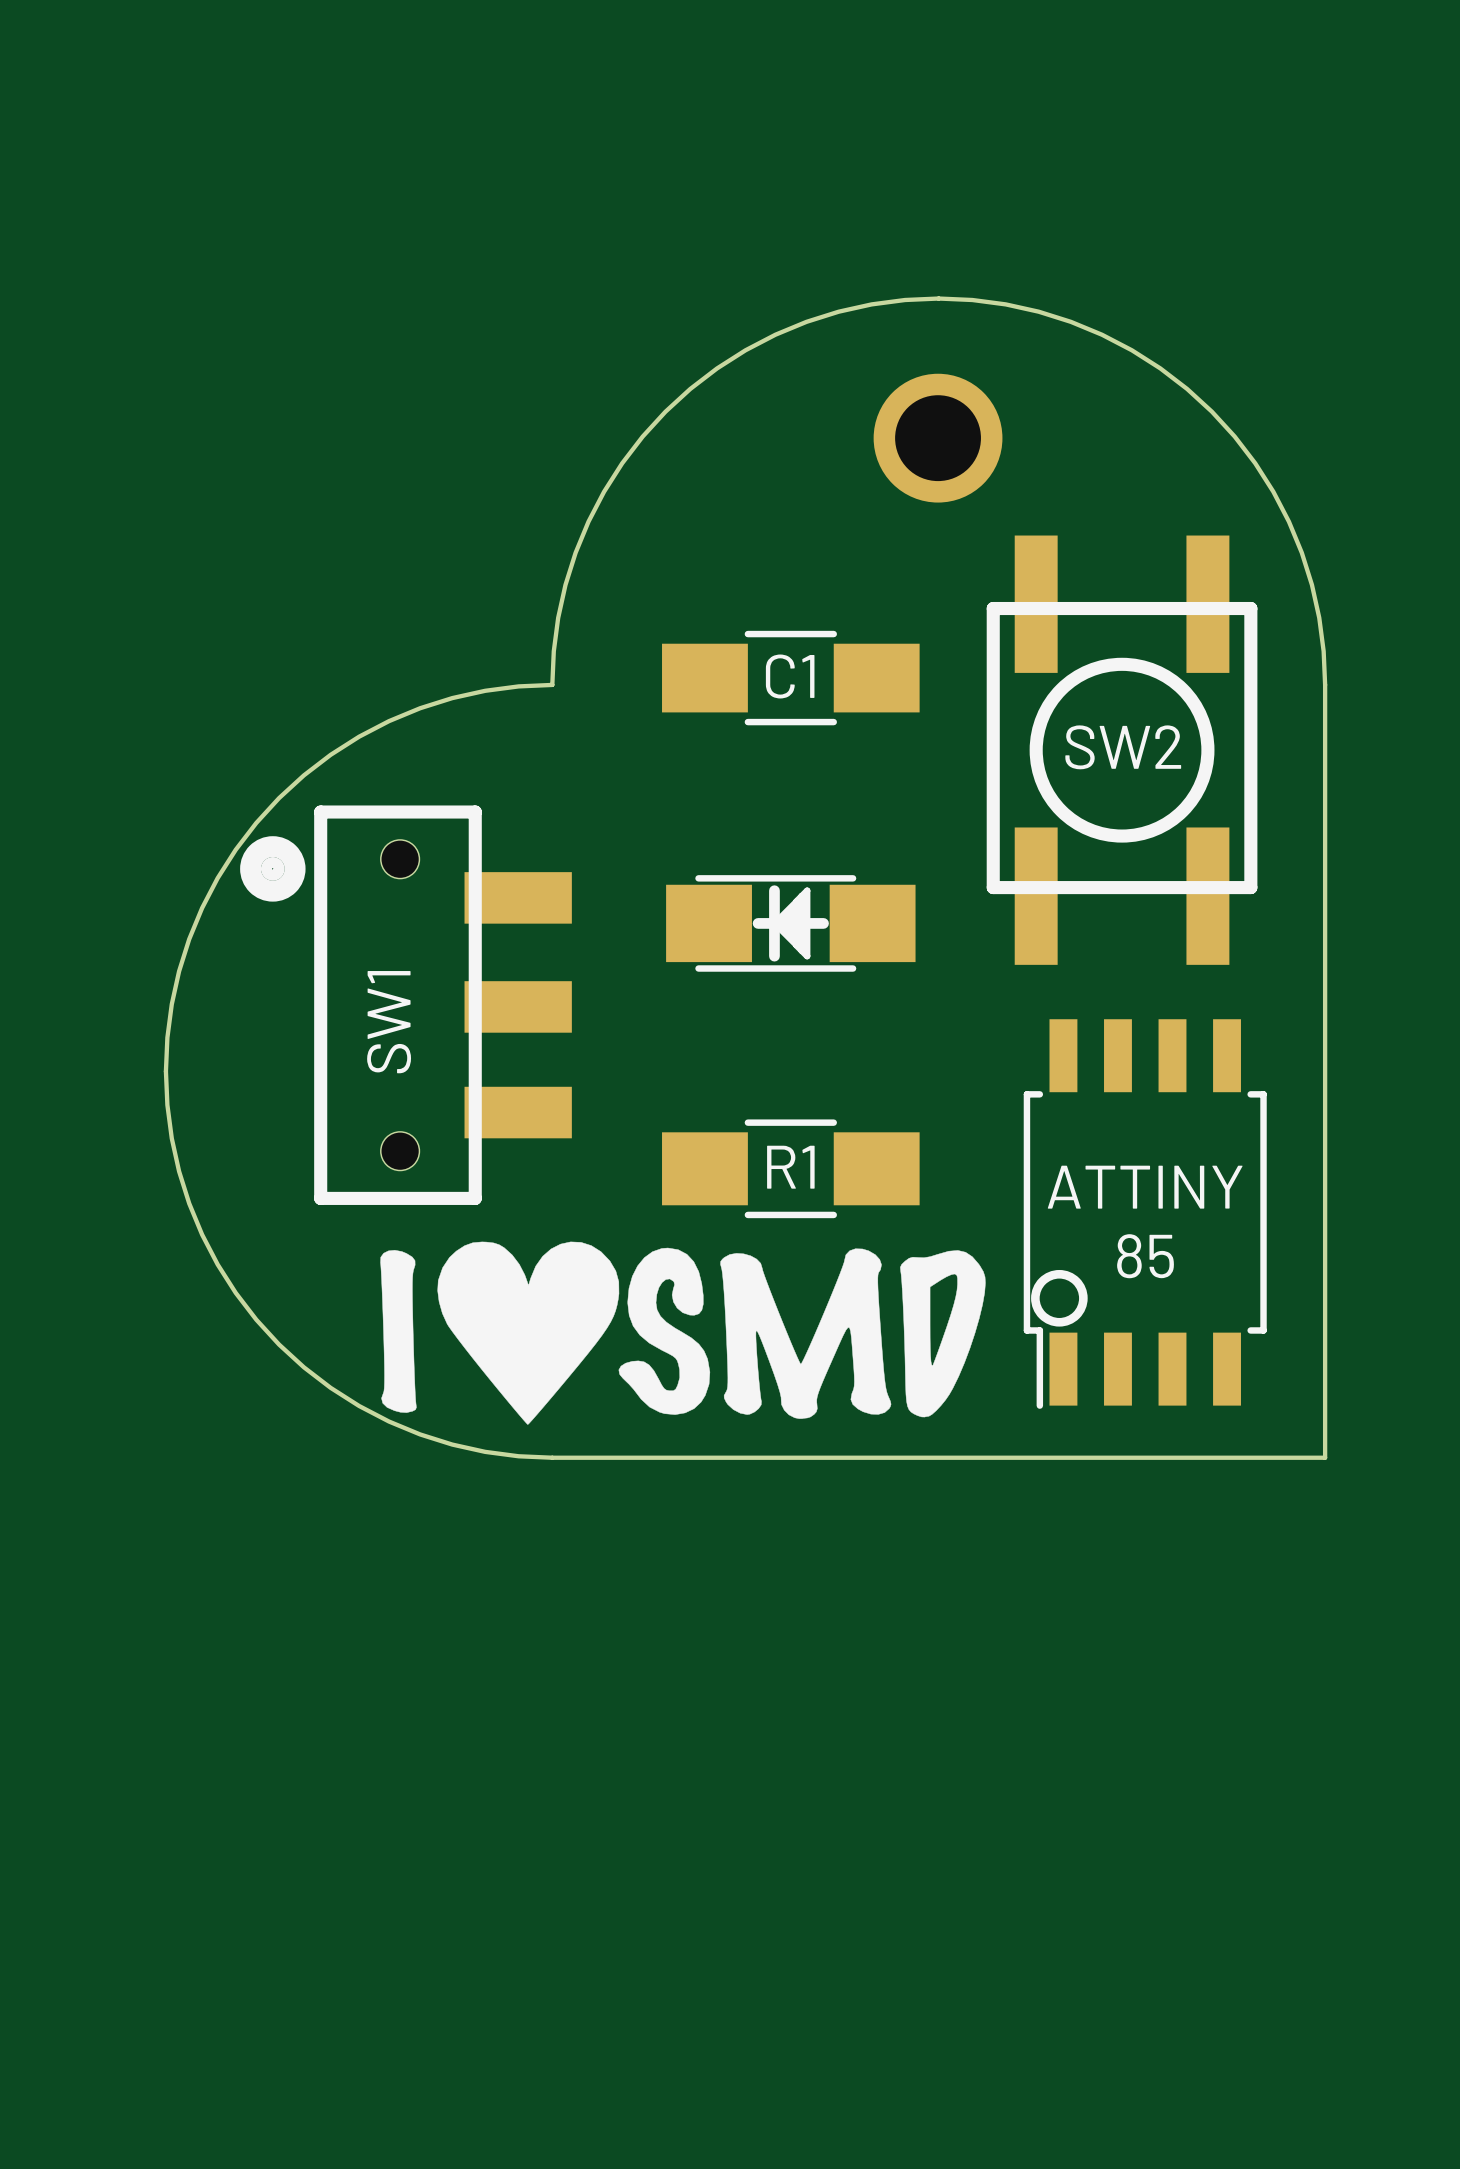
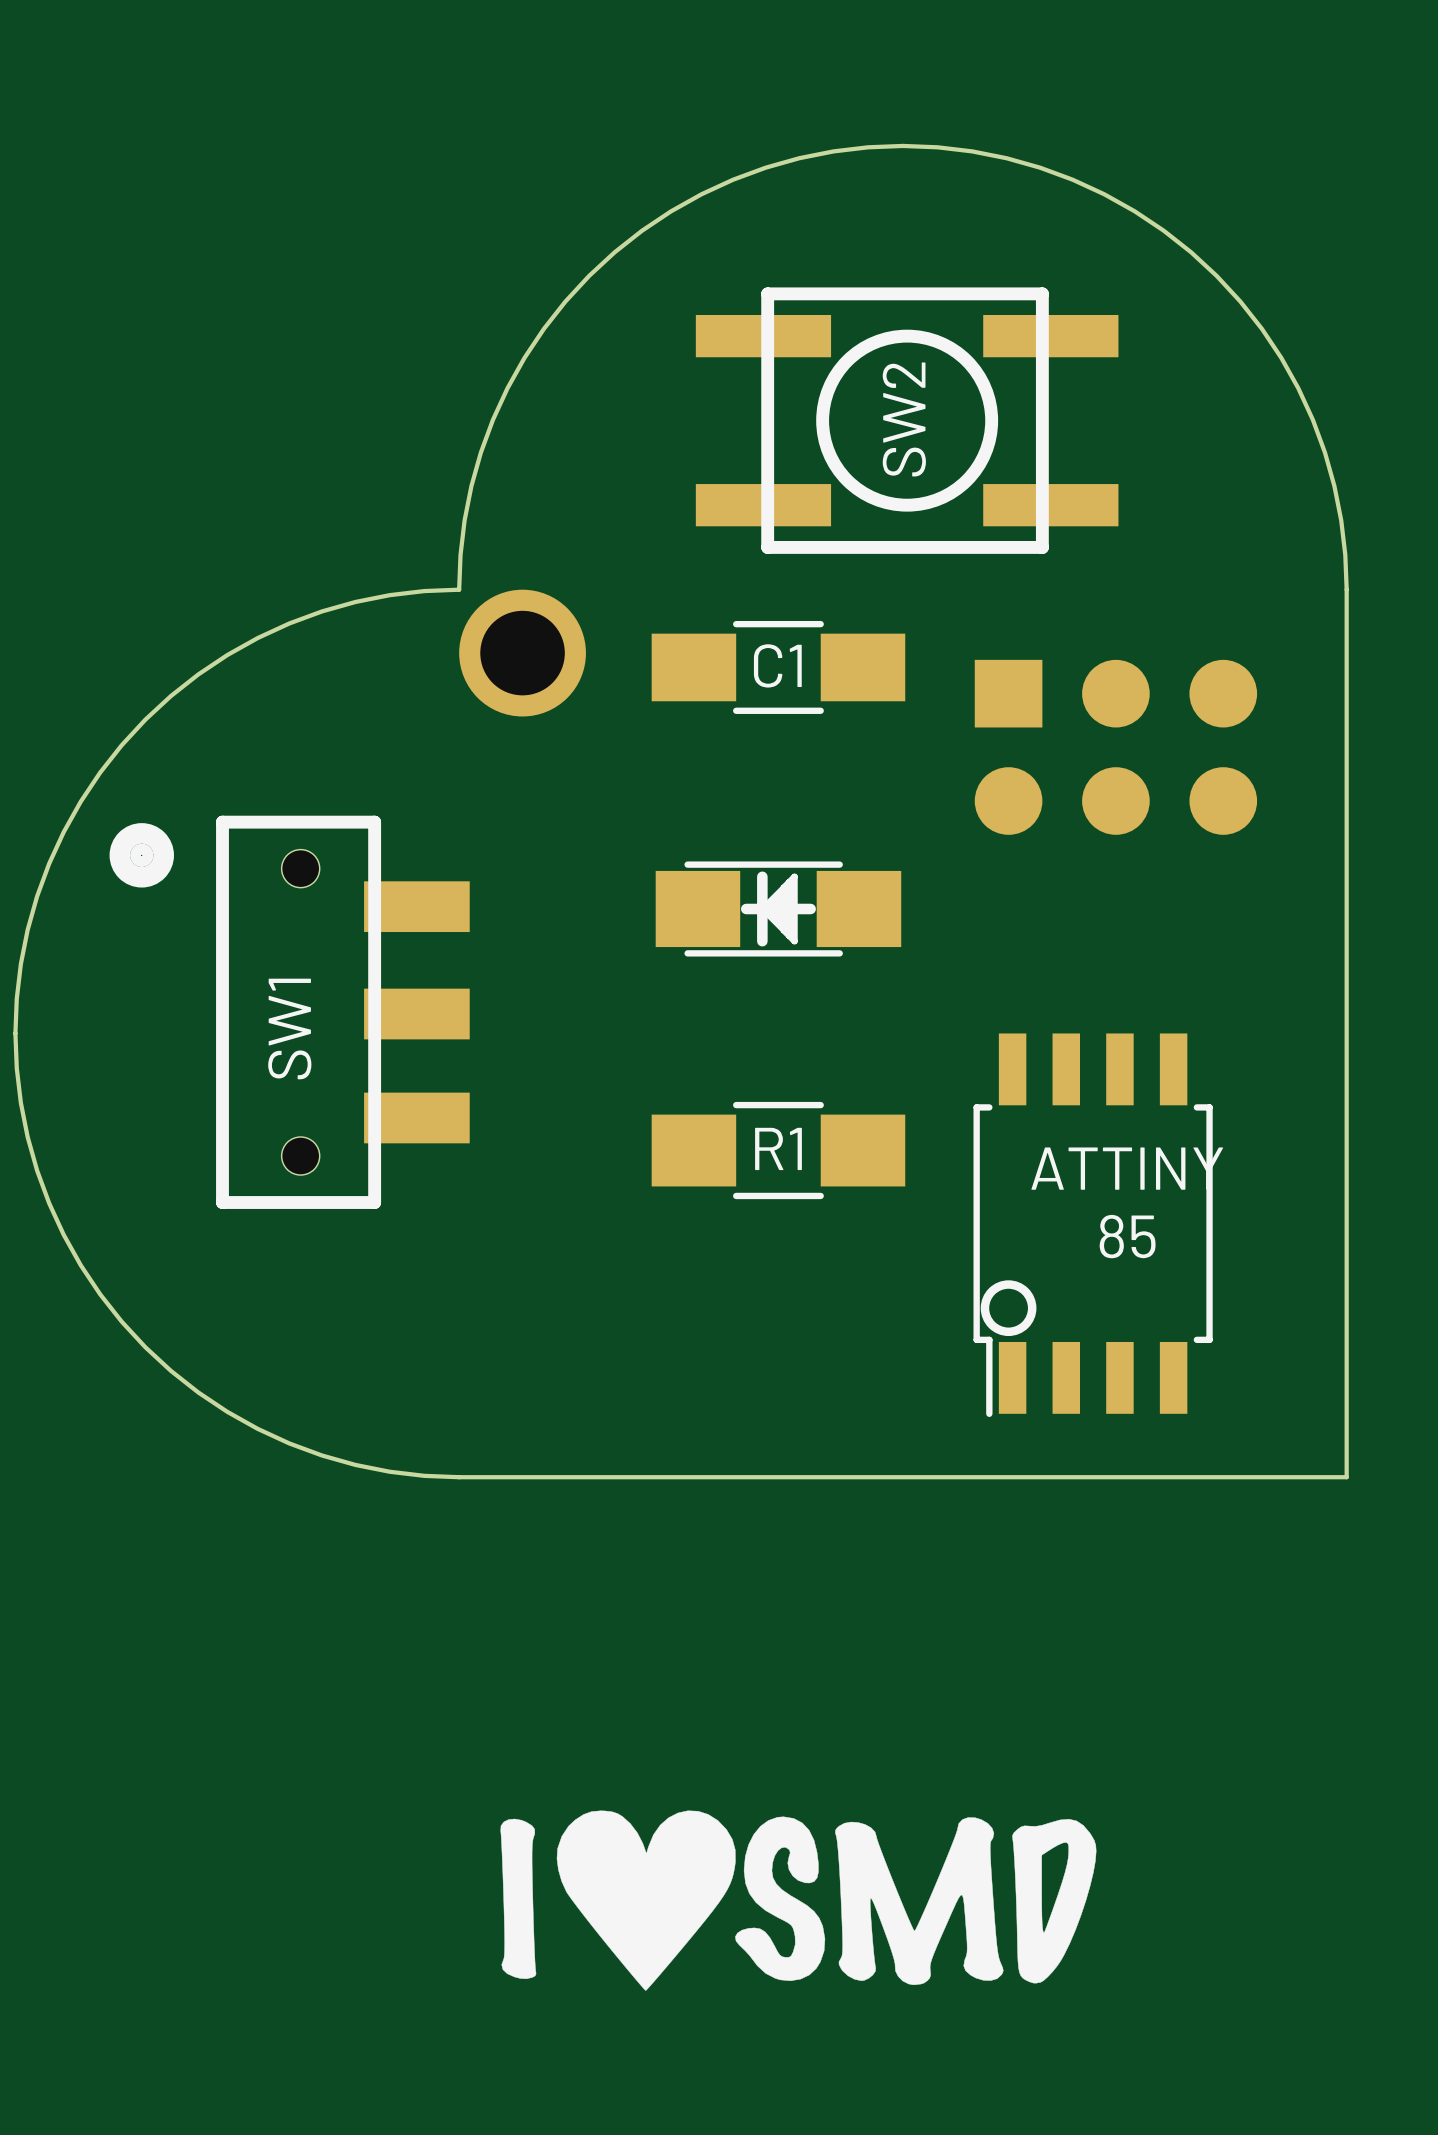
board edge: (938, 298) (871, 304) (806, 321) (745, 350) (690, 388) (642, 436) (622, 463) (588, 521) (565, 584) (558, 617) (552, 684) (485, 690) (452, 698) (420, 708) (359, 736) (303, 775) (256, 822) (235, 849) (202, 908) (179, 971) (167, 1037) (167, 1105) (179, 1171) (189, 1203) (217, 1264) (256, 1319) (303, 1367) (359, 1405) (389, 1421) (452, 1444) (485, 1451) (552, 1457) (1325, 1457) (1325, 684) (1319, 617) (1301, 552) (1288, 521) (1255, 463) (1211, 411) (1160, 368) (1102, 334) (1038, 311) (1005, 304) (938, 298) -> (902, 145) (833, 151) (765, 167) (701, 194) (642, 230) (614, 252) (589, 275) (543, 328) (524, 357) (492, 419) (471, 486) (464, 520) (459, 589) (389, 595) (322, 611) (257, 638) (227, 655) (198, 674) (145, 719) (100, 772) (63, 831) (49, 863) (27, 929) (16, 998) (15, 1033) (20, 1102) (37, 1170) (49, 1203) (80, 1265) (121, 1321) (170, 1370) (198, 1392) (257, 1428) (322, 1455) (355, 1464) (424, 1475) (1346, 1477) (1346, 589) (1341, 520) (1324, 452) (1298, 388) (1261, 328) (1216, 275) (1163, 230) (1104, 194) (1040, 167) (972, 151) (902, 145)
part position: (938, 438) -> (522, 653)
SW2 rotation: 0° (1122, 750) -> 90° counterclockwise (907, 420)
SW2 position: (1122, 750) -> (907, 420)
part: none -> (1115, 747)
drawing position: (272, 868) -> (141, 855)
drawing position: (272, 868) -> (141, 855)
drawing position: (272, 868) -> (141, 855)
SW1 position: (443, 1005) -> (342, 1012)
part position: (1145, 1214) -> (1093, 1225)
drawing position: (682, 1333) -> (798, 1900)

